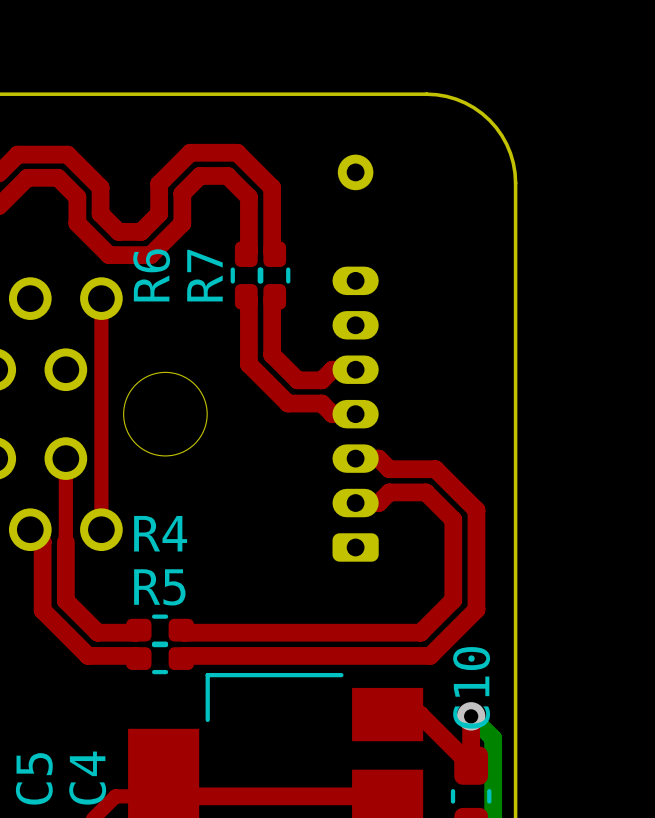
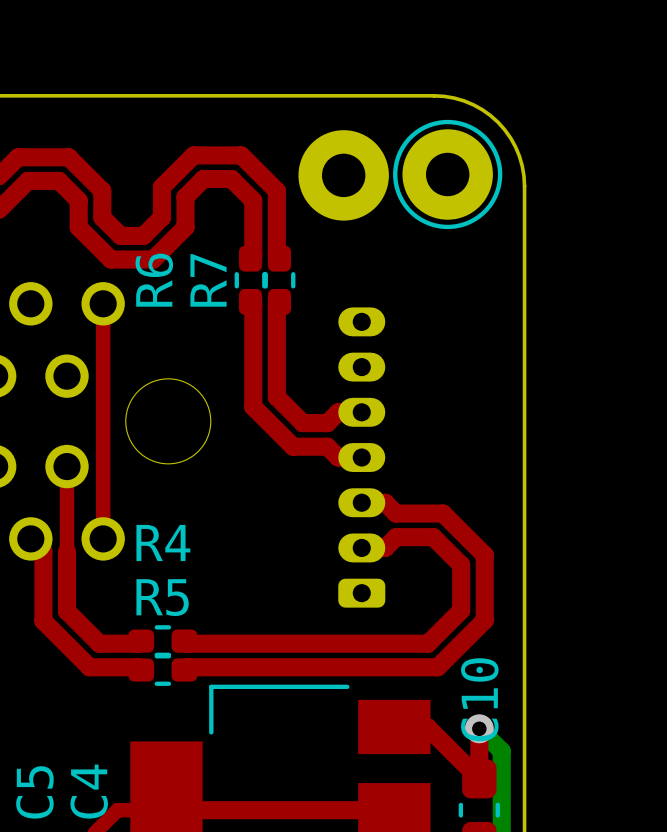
part footprint: [337, 154, 374, 191] -> [298, 130, 389, 221]
part: none -> (447, 174)
top track: (272, 354) (297, 380) (321, 380) (332, 369) (355, 369) -> (276, 360) (276, 397) (302, 423) (327, 423) (338, 412) (361, 412)
top track: (248, 364) (288, 403) (321, 403) (332, 414) (355, 414) -> (253, 370) (253, 406) (293, 446) (327, 446) (338, 457) (361, 457)
part position: (355, 414) -> (361, 457)
top track: (355, 458) (378, 458) (389, 469) (435, 469) (476, 510) (476, 545) -> (361, 502) (385, 502) (396, 513) (443, 513) (484, 555)
top track: (355, 503) (378, 503) (389, 492) (425, 492) (453, 519) (453, 555) -> (361, 547) (385, 547) (396, 537) (433, 537) (461, 564)

